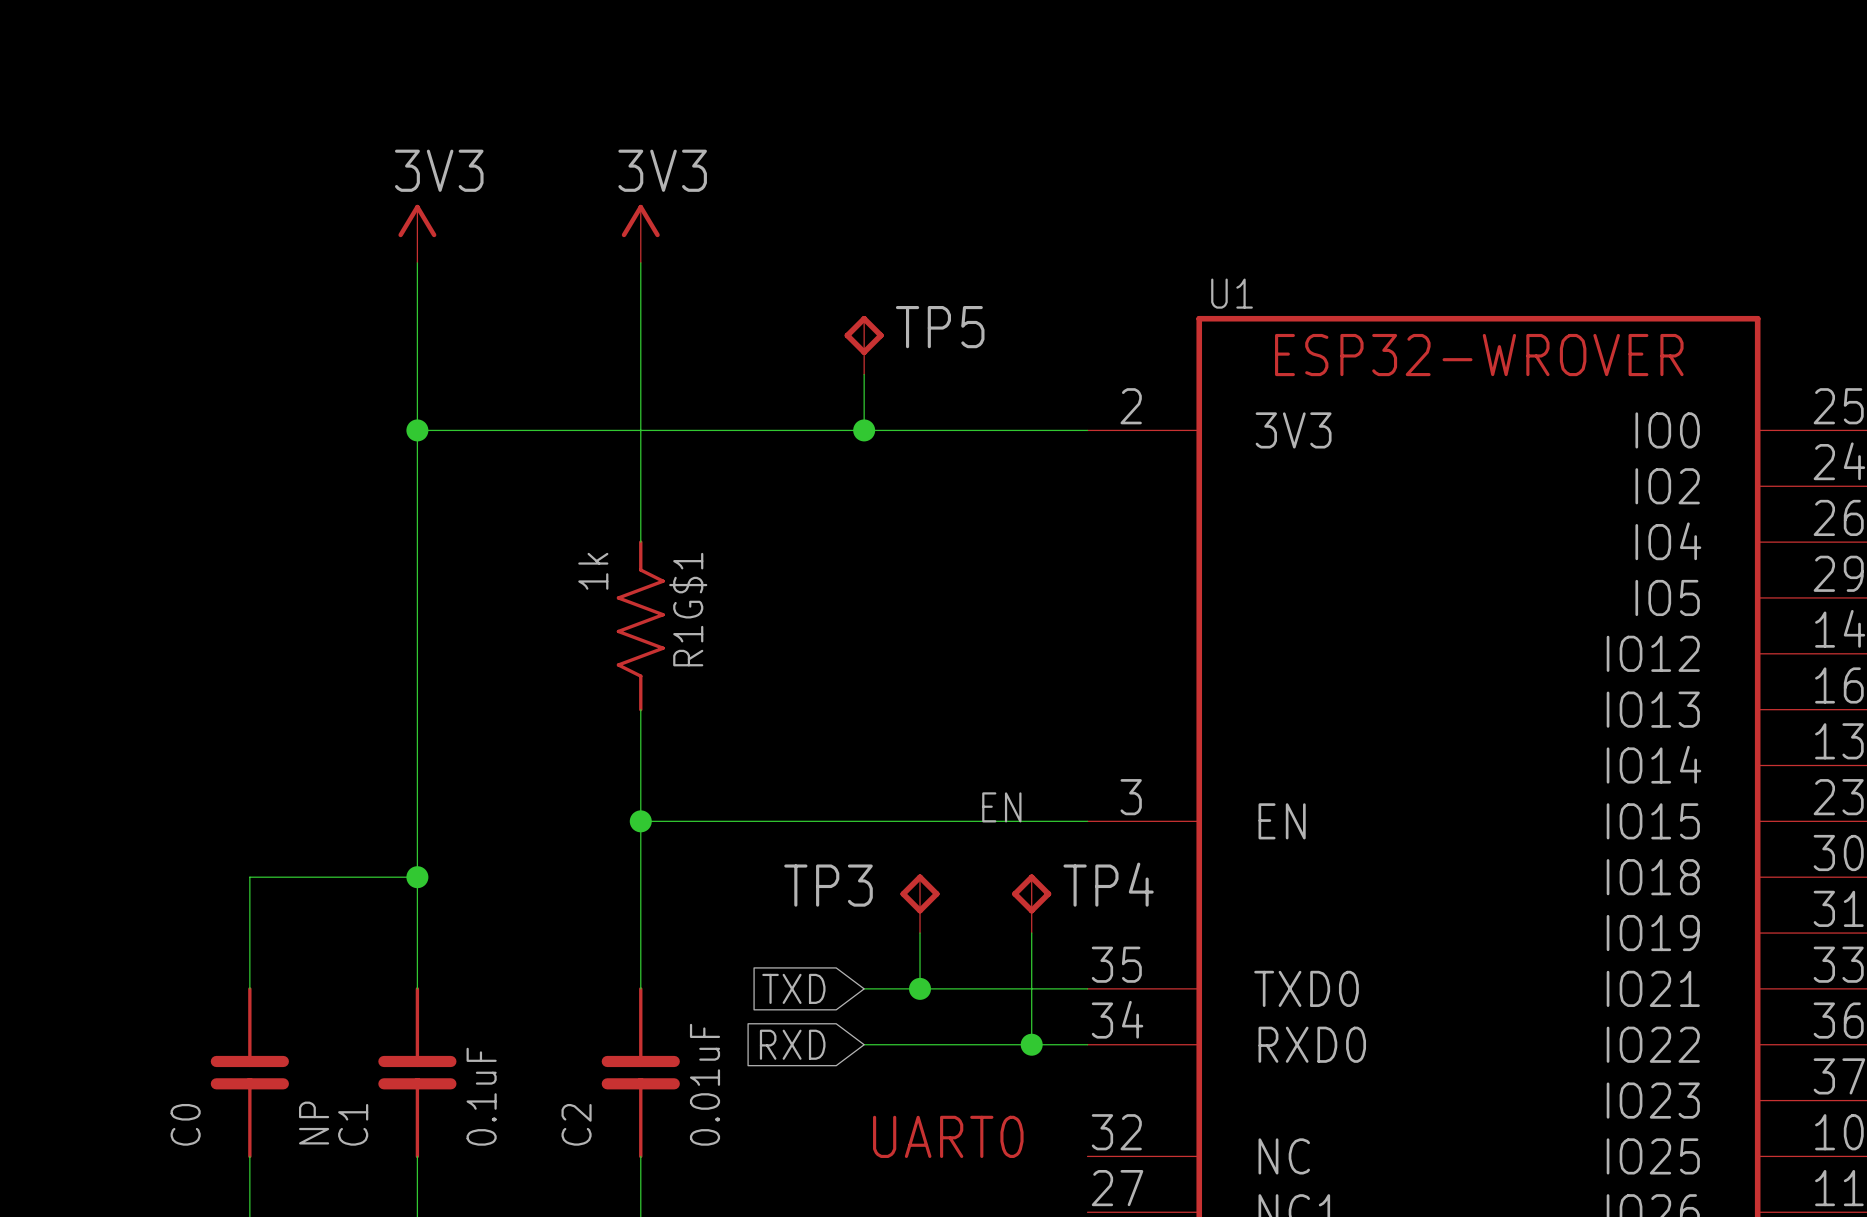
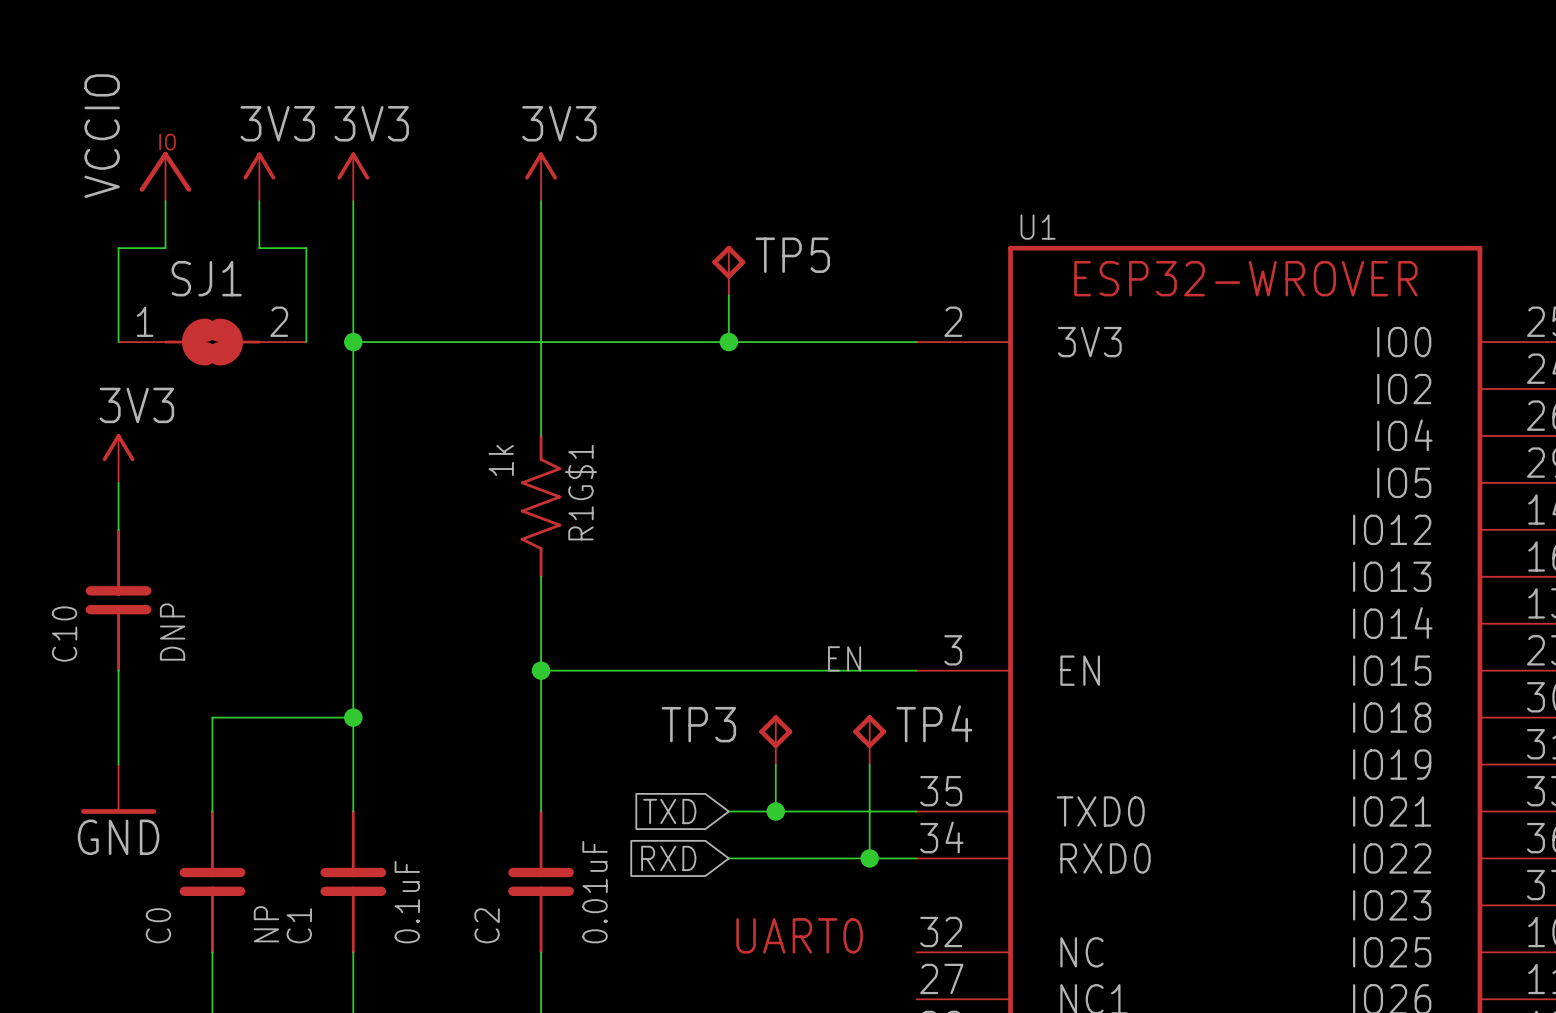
power symbol: none -> VCCIO (165, 176)
power symbol: none -> 3V3 (259, 176)
wire: none -> (165, 201) (165, 248) (118, 248) (118, 342)
wire: none -> (259, 201) (259, 248) (306, 248) (306, 342)
SJ1: none -> (212, 342)
power symbol: none -> 3V3 (118, 458)
wire: none -> (118, 482) (118, 529)
C10: none -> DNP (118, 600)
wire: none -> (118, 670) (118, 764)
power symbol: none -> GND (118, 789)

